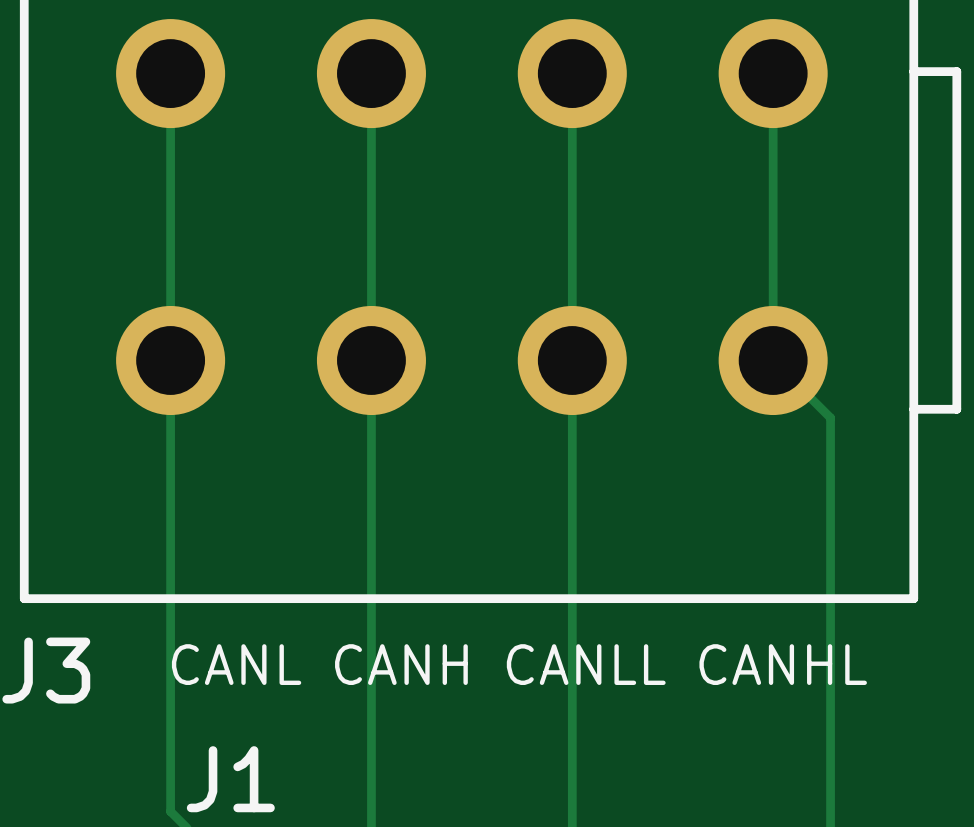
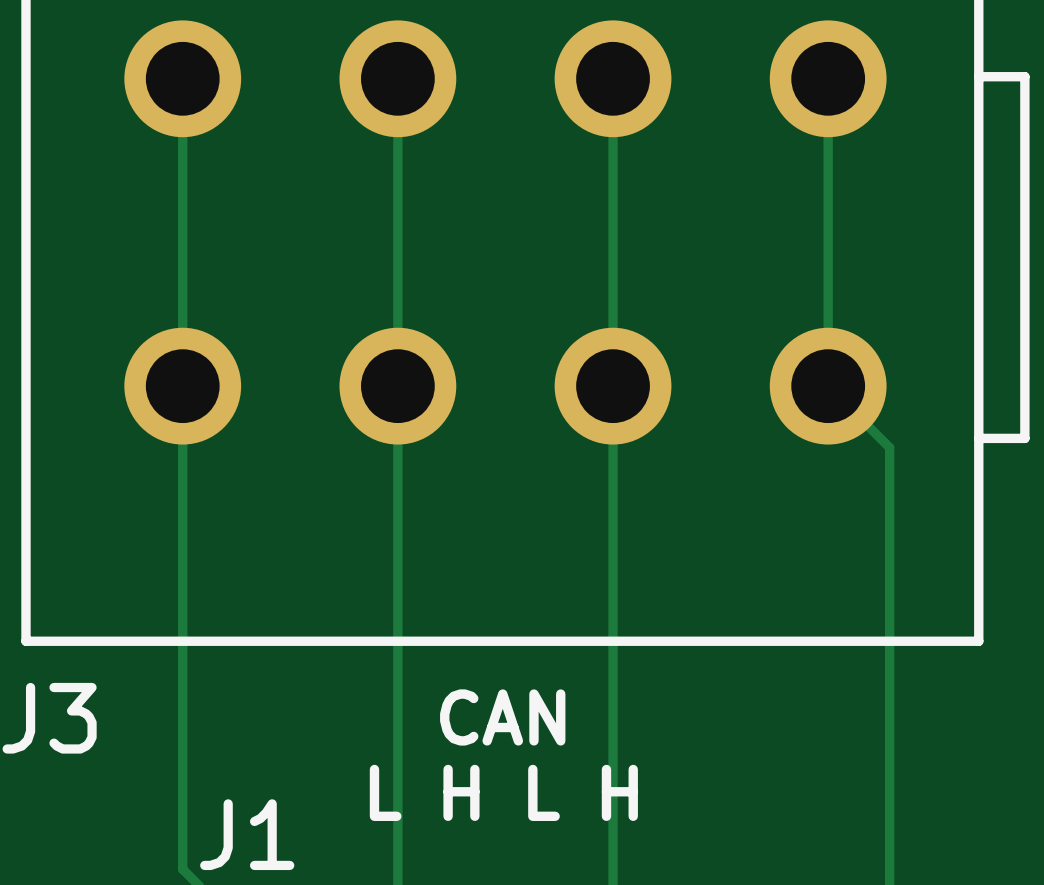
text: CANL CANH CANLL CANHL (519, 664) -> none
text: none -> CAN (502, 717)
text: none -> L H L H (503, 792)

